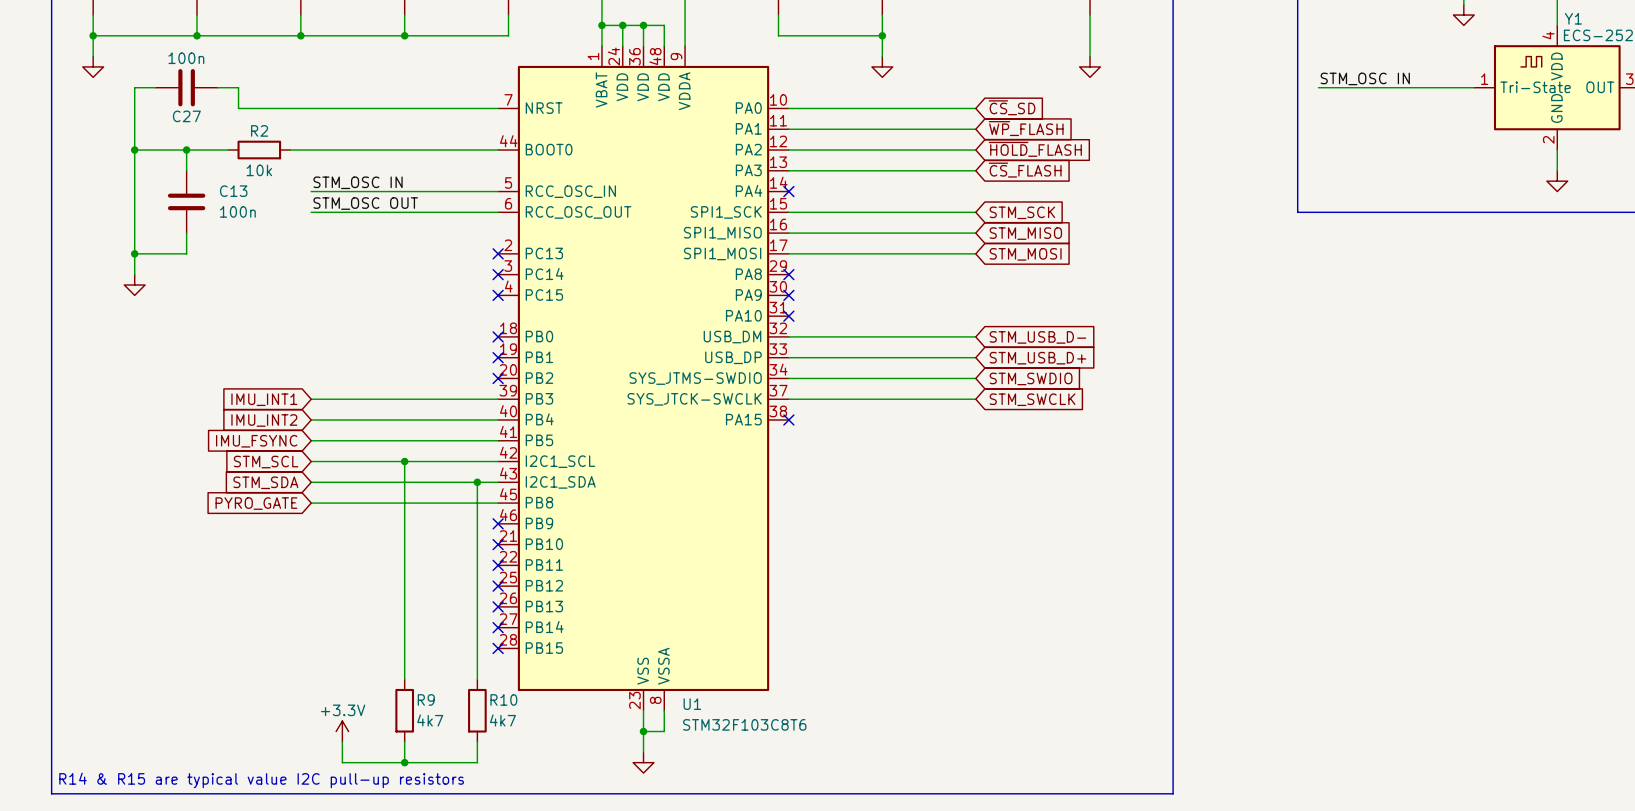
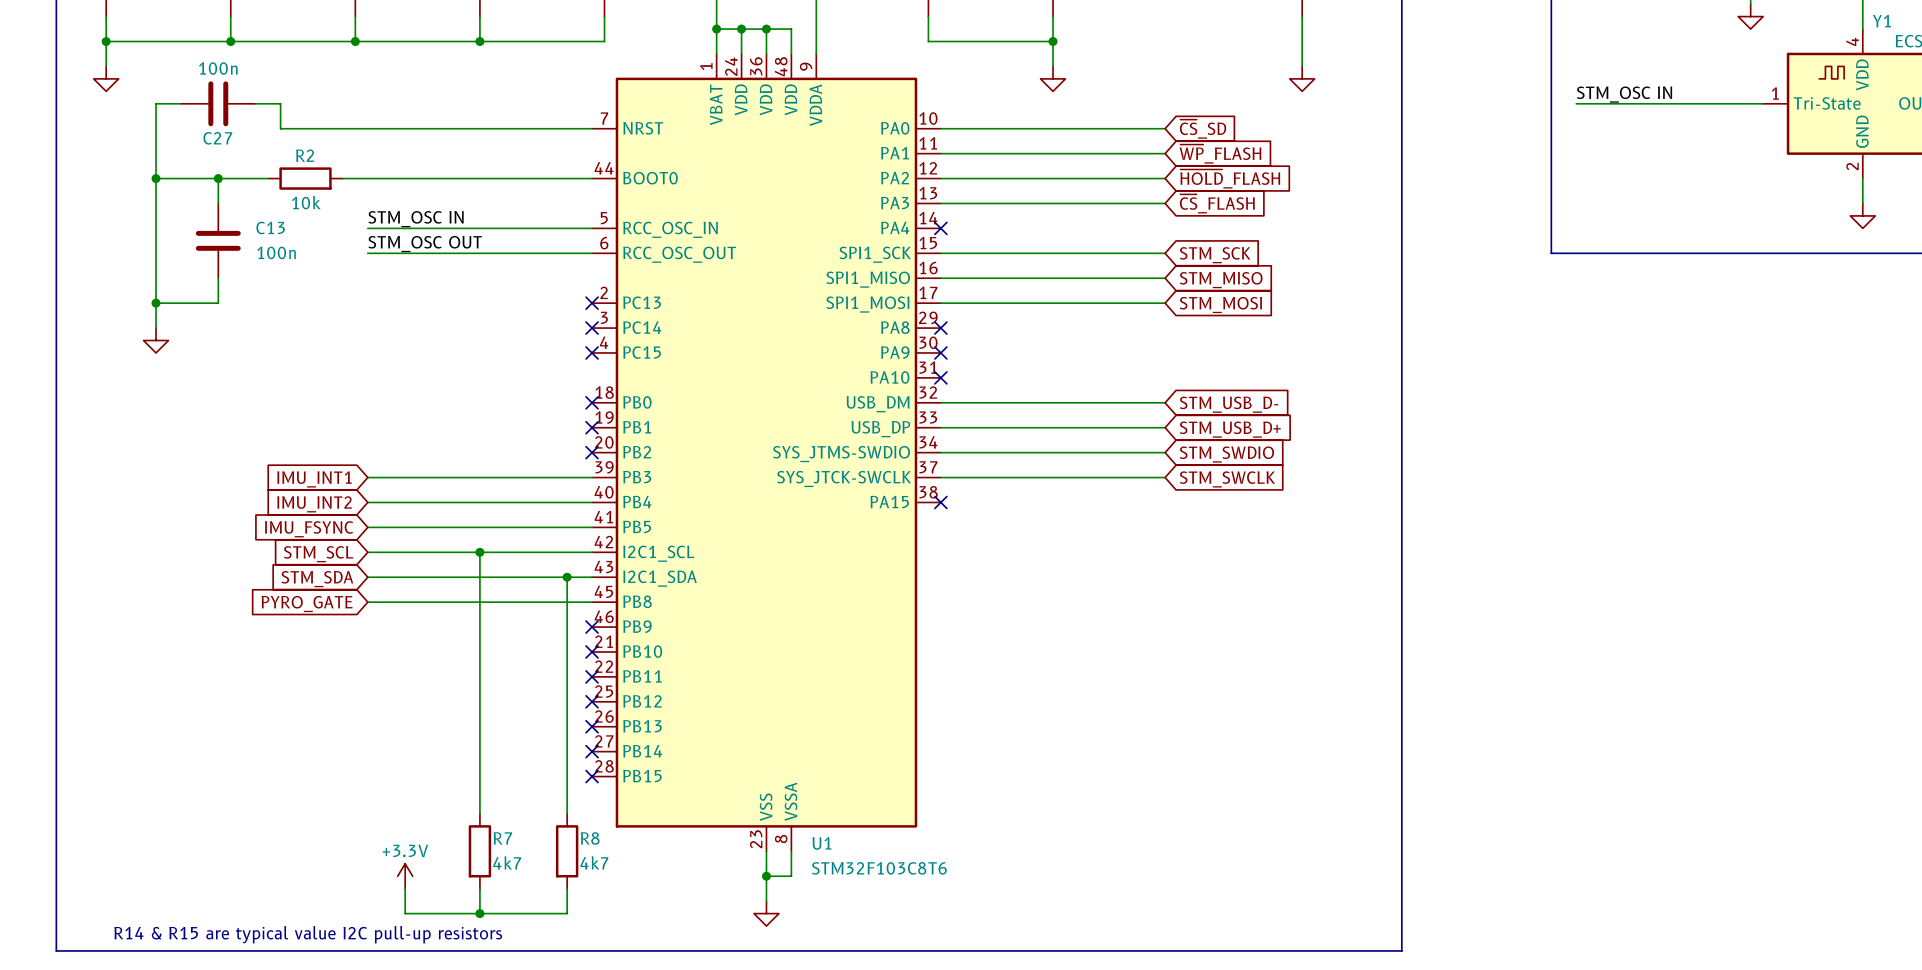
R9 name: R9 (426, 699) -> R7 (502, 838)
R10 name: R10 (503, 699) -> R8 (590, 838)

